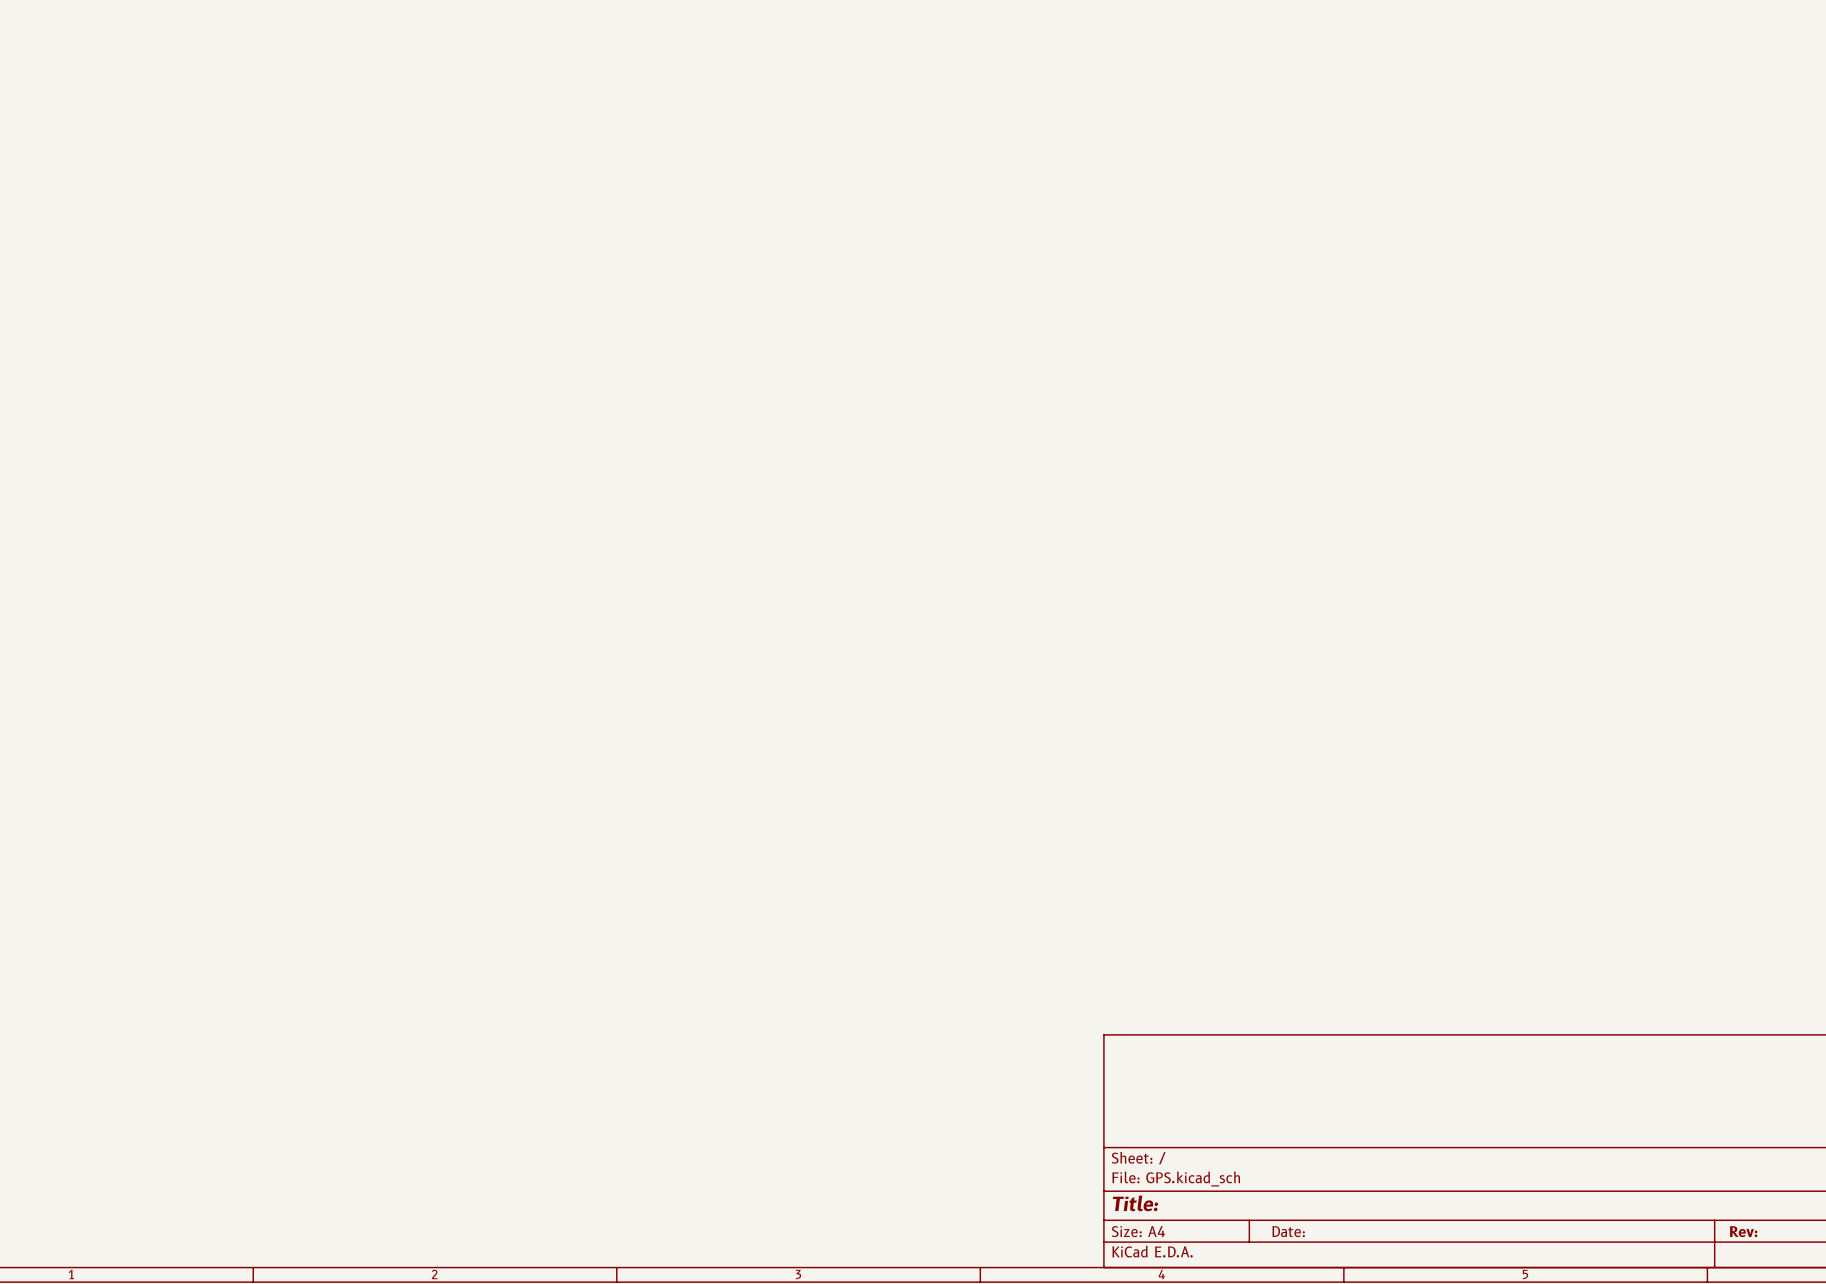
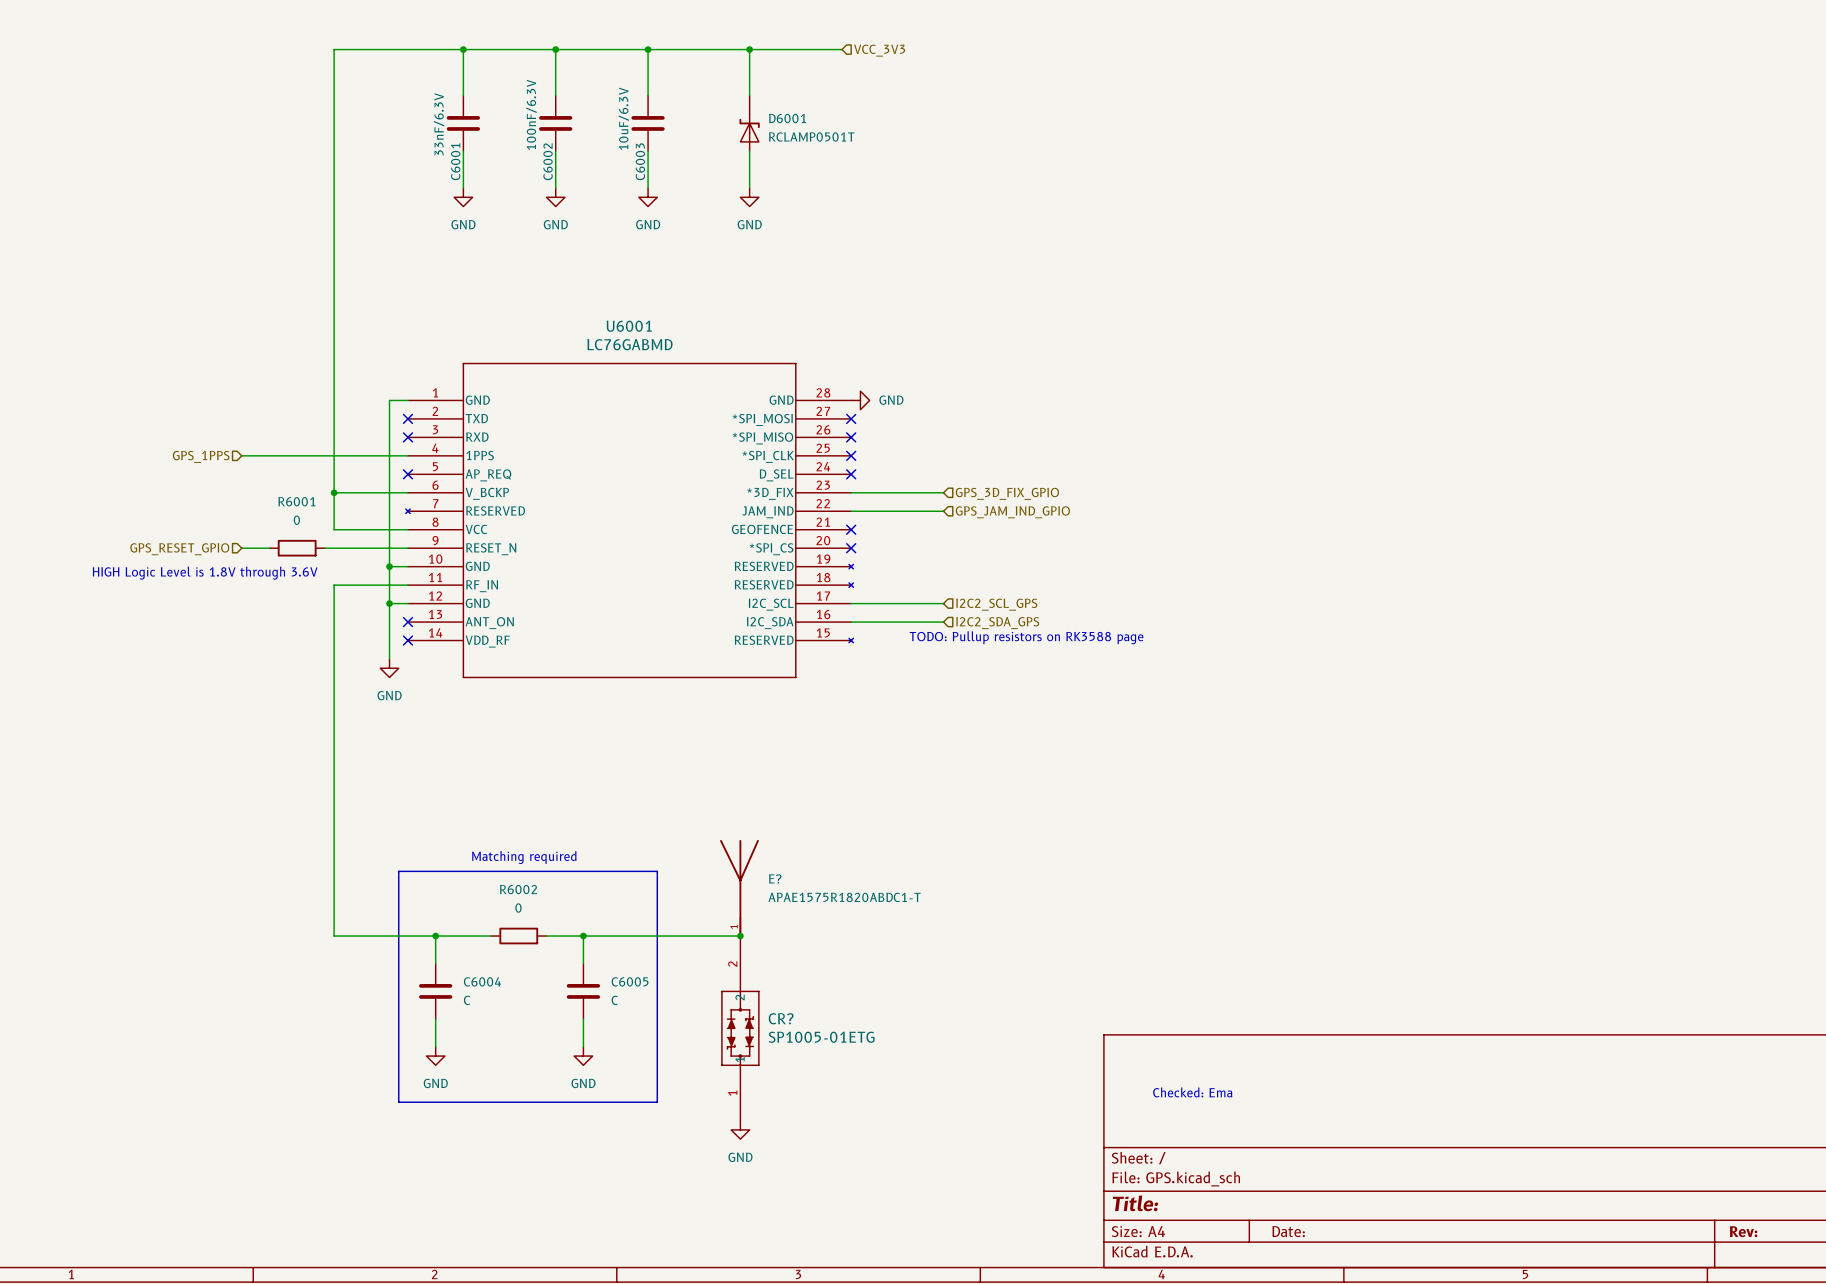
wire: none -> (463, 49) (463, 95)
junction: none -> (463, 49)
wire: none -> (555, 49) (555, 95)
junction: none -> (555, 49)
wire: none -> (648, 49) (648, 95)
junction: none -> (648, 49)
wire: none -> (749, 49) (749, 95)
junction: none -> (749, 49)
wire: none -> (841, 49) (334, 49) (334, 529) (407, 529)
hierarchical label: none -> VCC_3V3 (879, 50)
C6001: none -> 33nF/6.3V (463, 123)
C6002: none -> 100nF/6.3V (555, 123)
C6003: none -> 10uF/6.3V (648, 123)
D6001: none -> RCLAMP0501T (749, 123)
wire: none -> (463, 151) (463, 188)
wire: none -> (555, 151) (555, 188)
wire: none -> (648, 151) (648, 188)
wire: none -> (749, 151) (749, 188)
power symbol: none -> GND (463, 197)
power symbol: none -> GND (555, 197)
power symbol: none -> GND (648, 197)
power symbol: none -> GND (749, 197)
wire: none -> (407, 400) (389, 400) (389, 659)
power symbol: none -> GND (860, 400)
no-connect mark: none -> (407, 418)
no-connect mark: none -> (851, 418)
no-connect mark: none -> (407, 437)
no-connect mark: none -> (851, 437)
wire: none -> (241, 455) (407, 455)
no-connect mark: none -> (851, 455)
hierarchical label: none -> GPS_1PPS (201, 456)
no-connect mark: none -> (407, 474)
no-connect mark: none -> (851, 474)
wire: none -> (334, 492) (407, 492)
junction: none -> (334, 492)
wire: none -> (851, 492) (943, 492)
hierarchical label: none -> GPS_3D_FIX_GPIO (1007, 493)
wire: none -> (851, 511) (943, 511)
hierarchical label: none -> GPS_JAM_IND_GPIO (1012, 512)
U6001: none -> LC76GABMD (629, 520)
no-connect mark: none -> (851, 529)
wire: none -> (241, 548) (269, 548)
R6001: none -> 0 (297, 548)
wire: none -> (324, 548) (407, 548)
no-connect mark: none -> (851, 548)
hierarchical label: none -> GPS_RESET_GPIO (179, 549)
wire: none -> (389, 566) (407, 566)
junction: none -> (389, 566)
text: none -> HIGH Logic Level is 1.8V through 3.6V (205, 573)
wire: none -> (407, 585) (334, 585) (334, 936) (491, 936)
wire: none -> (389, 603) (407, 603)
junction: none -> (389, 603)
wire: none -> (851, 603) (943, 603)
hierarchical label: none -> I2C2_SCL_GPS (996, 604)
no-connect mark: none -> (407, 622)
wire: none -> (851, 622) (943, 622)
hierarchical label: none -> I2C2_SDA_GPS (997, 623)
text: none -> TODO: Pullup resistors on RK3588 page (1026, 637)
no-connect mark: none -> (407, 640)
power symbol: none -> GND (389, 668)
text: none -> Matching required (524, 857)
line: none -> (398, 871) (657, 871) (657, 1102) (398, 1102) (398, 871)
E?: none -> APAE1575R1820ABDC1-T (739, 888)
wire: none -> (435, 936) (435, 963)
junction: none -> (435, 936)
R6002: none -> 0 (518, 936)
wire: none -> (546, 936) (740, 936)
wire: none -> (583, 936) (583, 963)
junction: none -> (583, 936)
junction: none -> (740, 936)
C6004: none -> C (435, 991)
C6005: none -> C (583, 991)
wire: none -> (435, 1019) (435, 1046)
wire: none -> (583, 1019) (583, 1046)
CR?: none -> SP1005-01ETG (740, 1028)
power symbol: none -> GND (435, 1056)
power symbol: none -> GND (583, 1056)
text: none -> Checked: Ema (1192, 1092)
power symbol: none -> GND (740, 1129)

